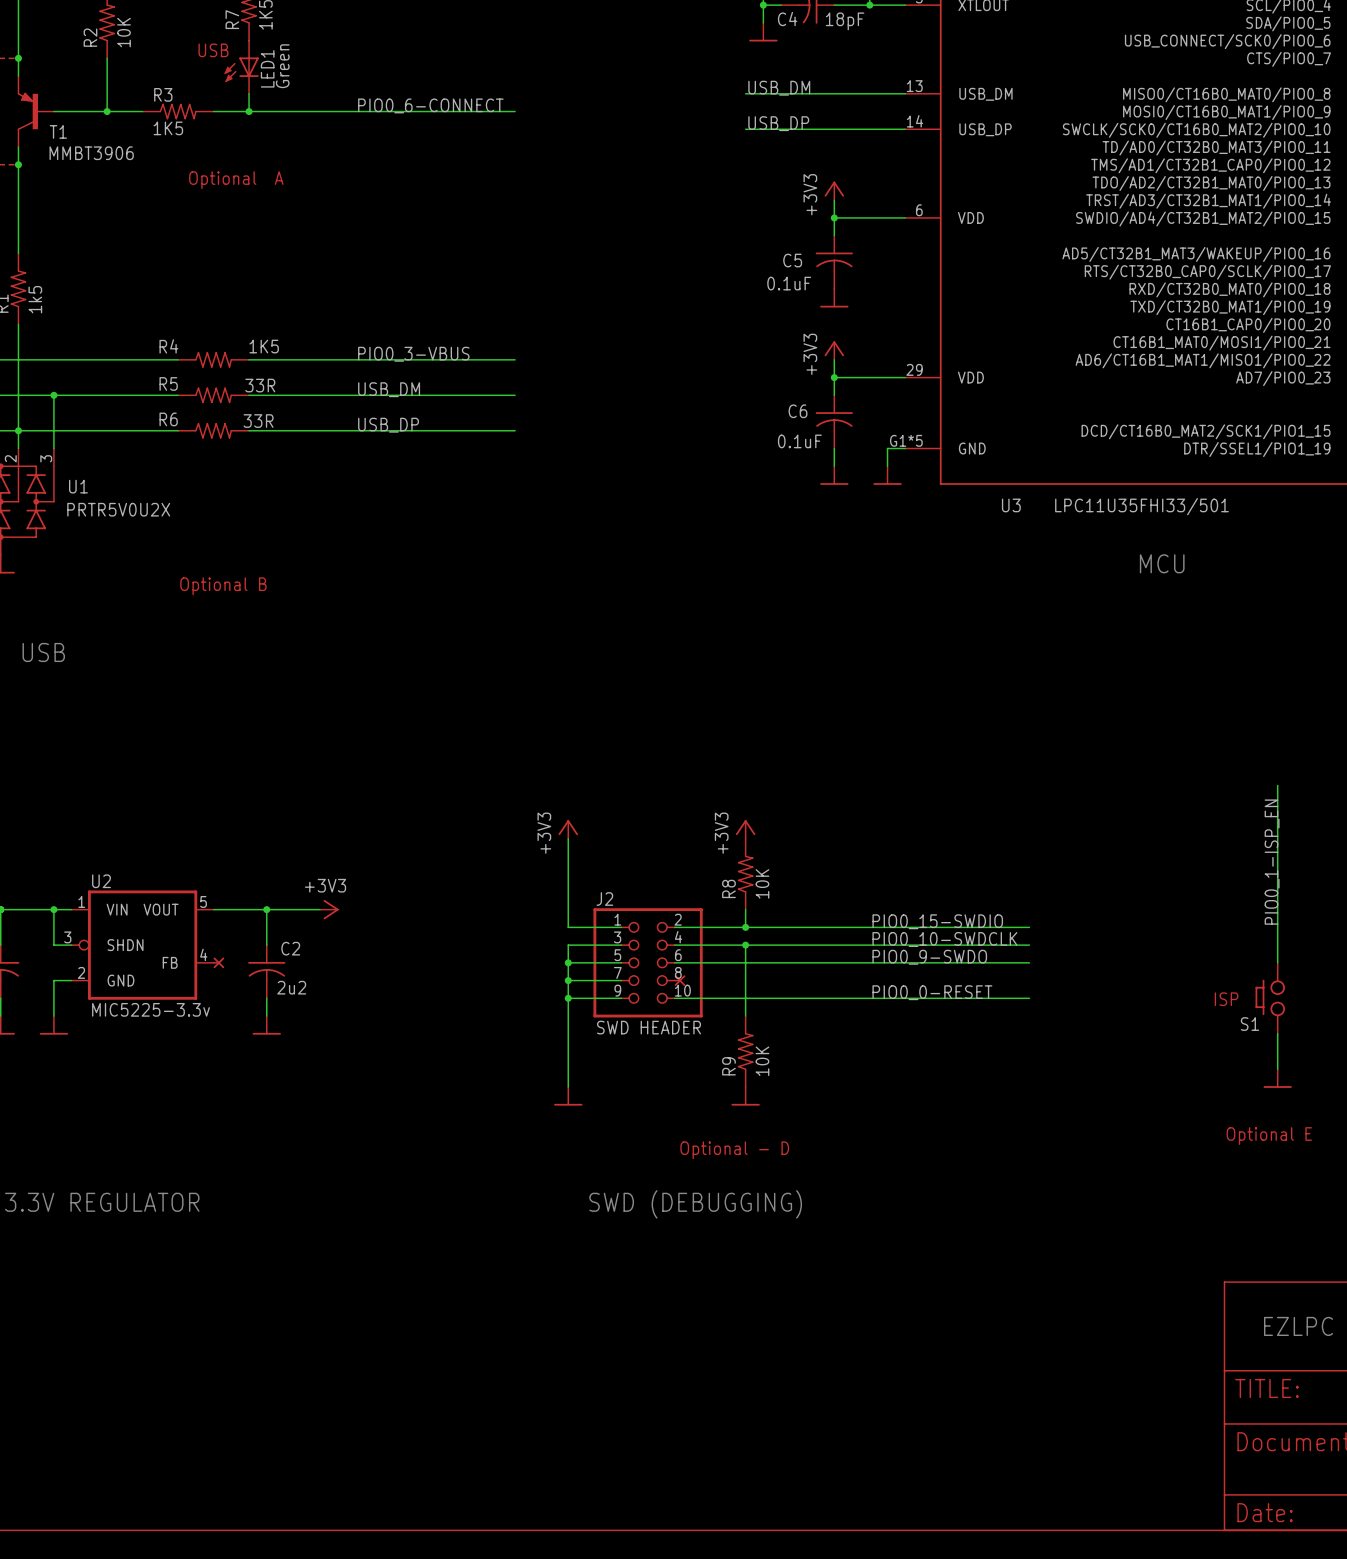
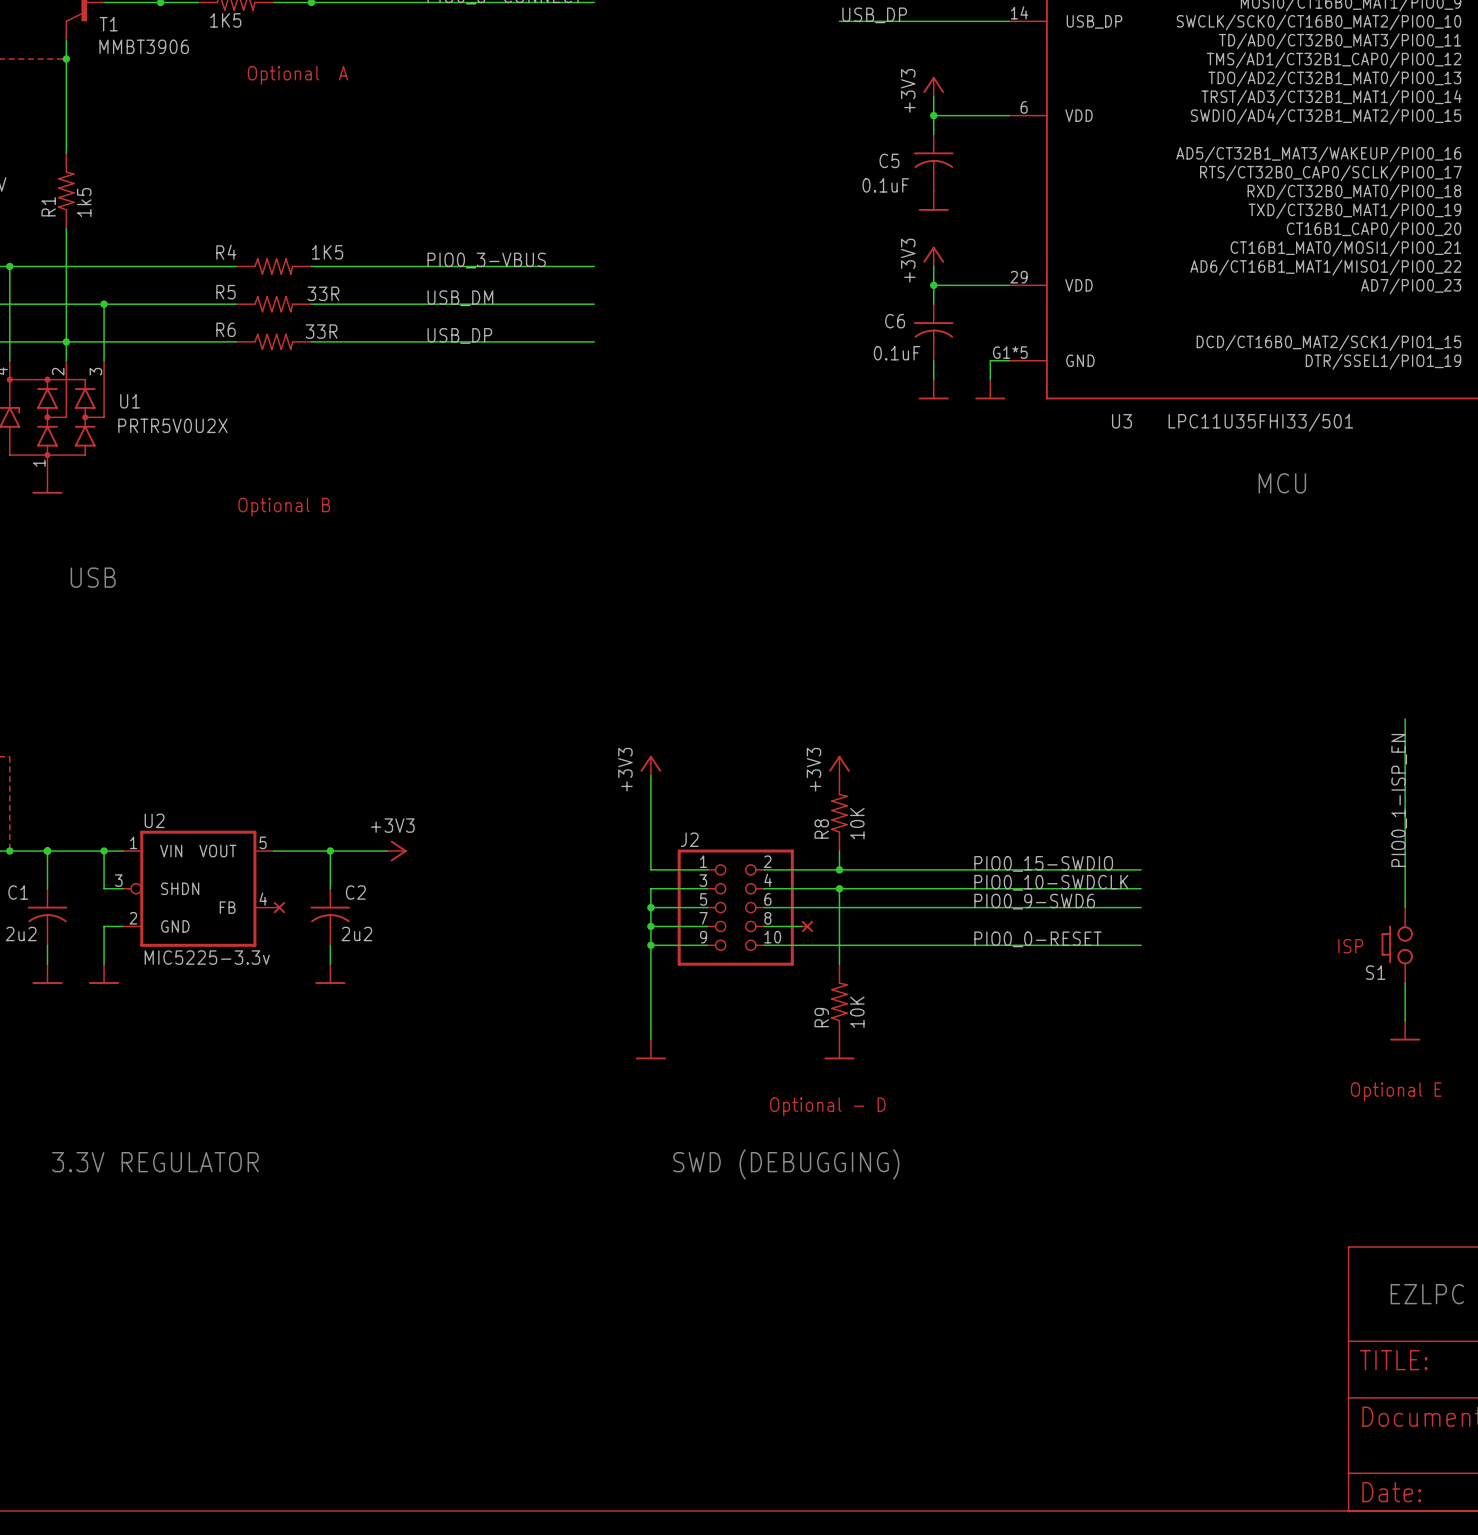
label: PIO0_9-SWDO (929, 957) -> PIO0_9-SWD6 (1034, 901)
wire: none -> (764, 926) (801, 926)
part position: (679, 980) -> (807, 926)
J2 value: SWD HEADER (649, 1027) -> none

